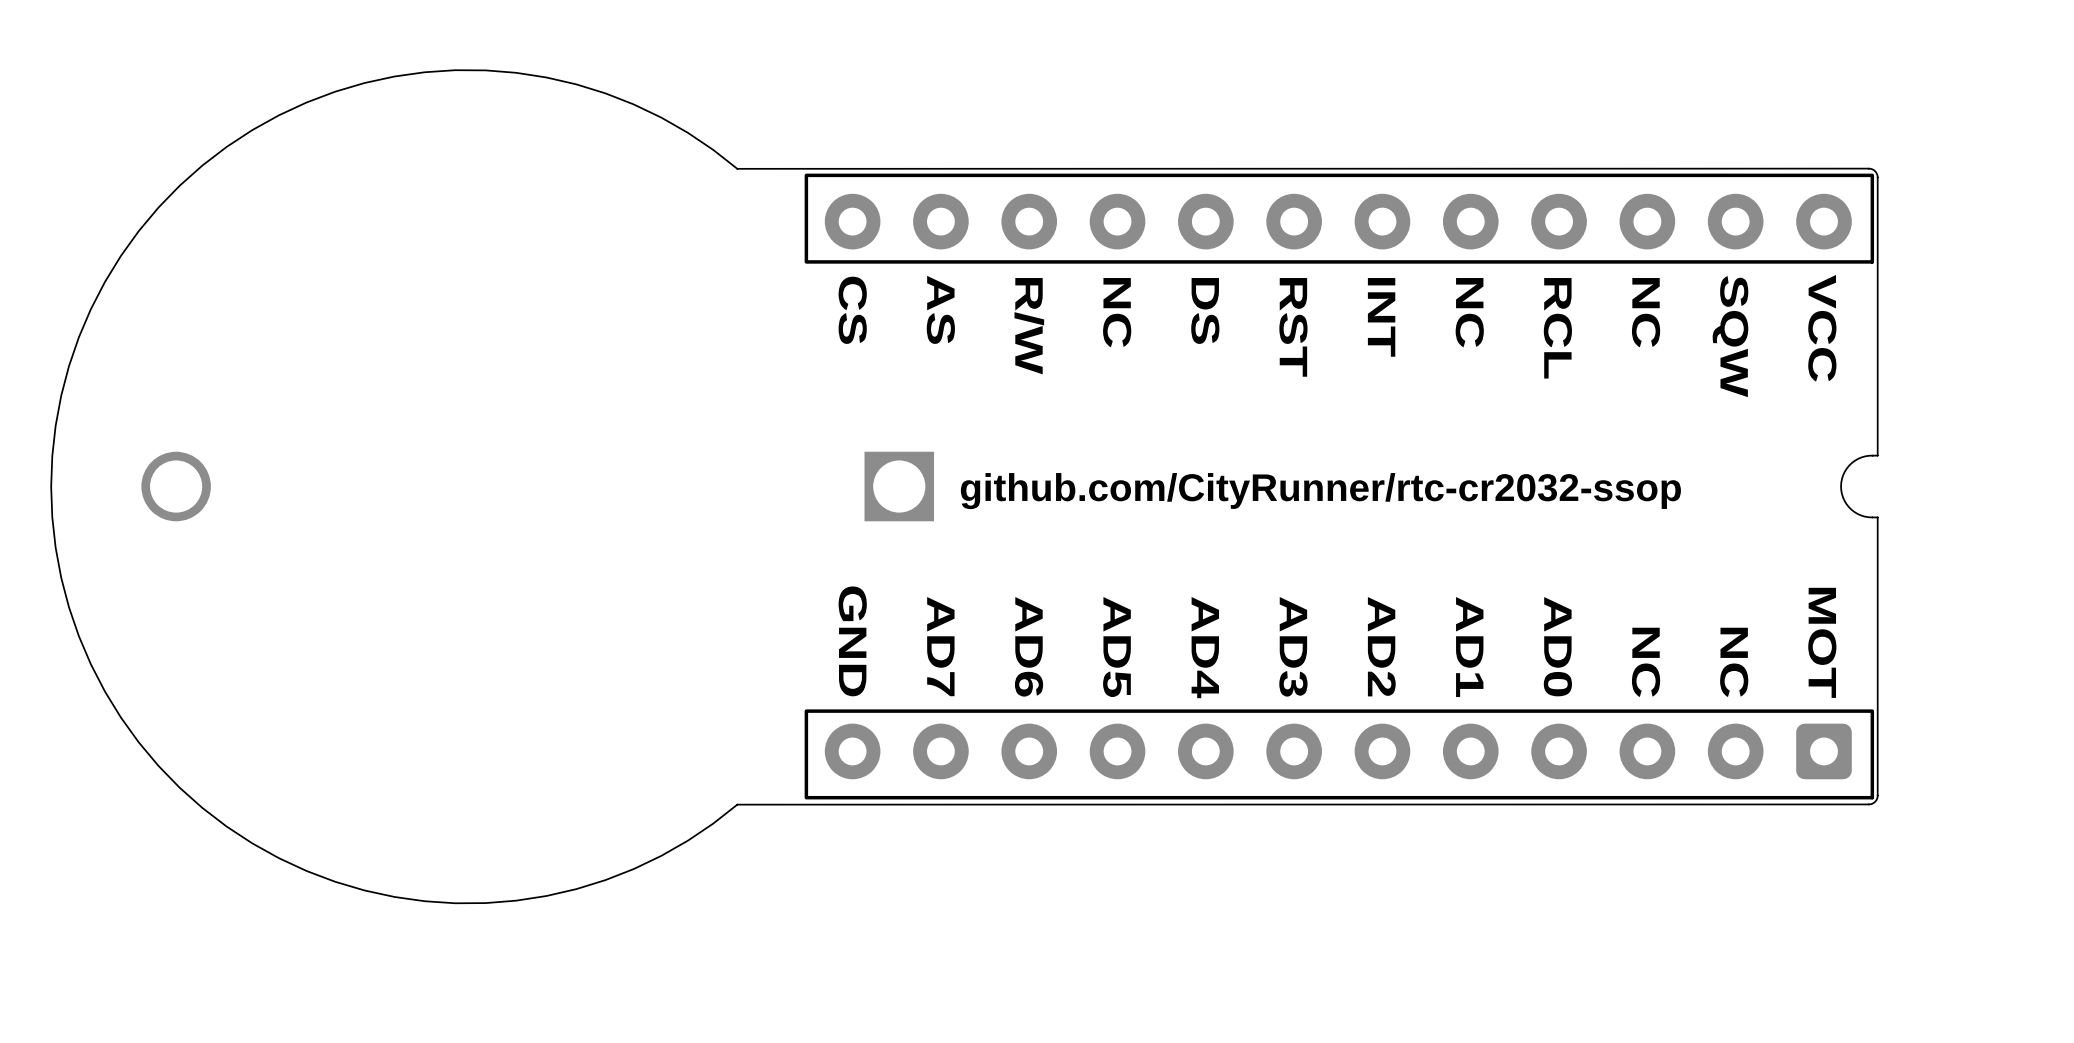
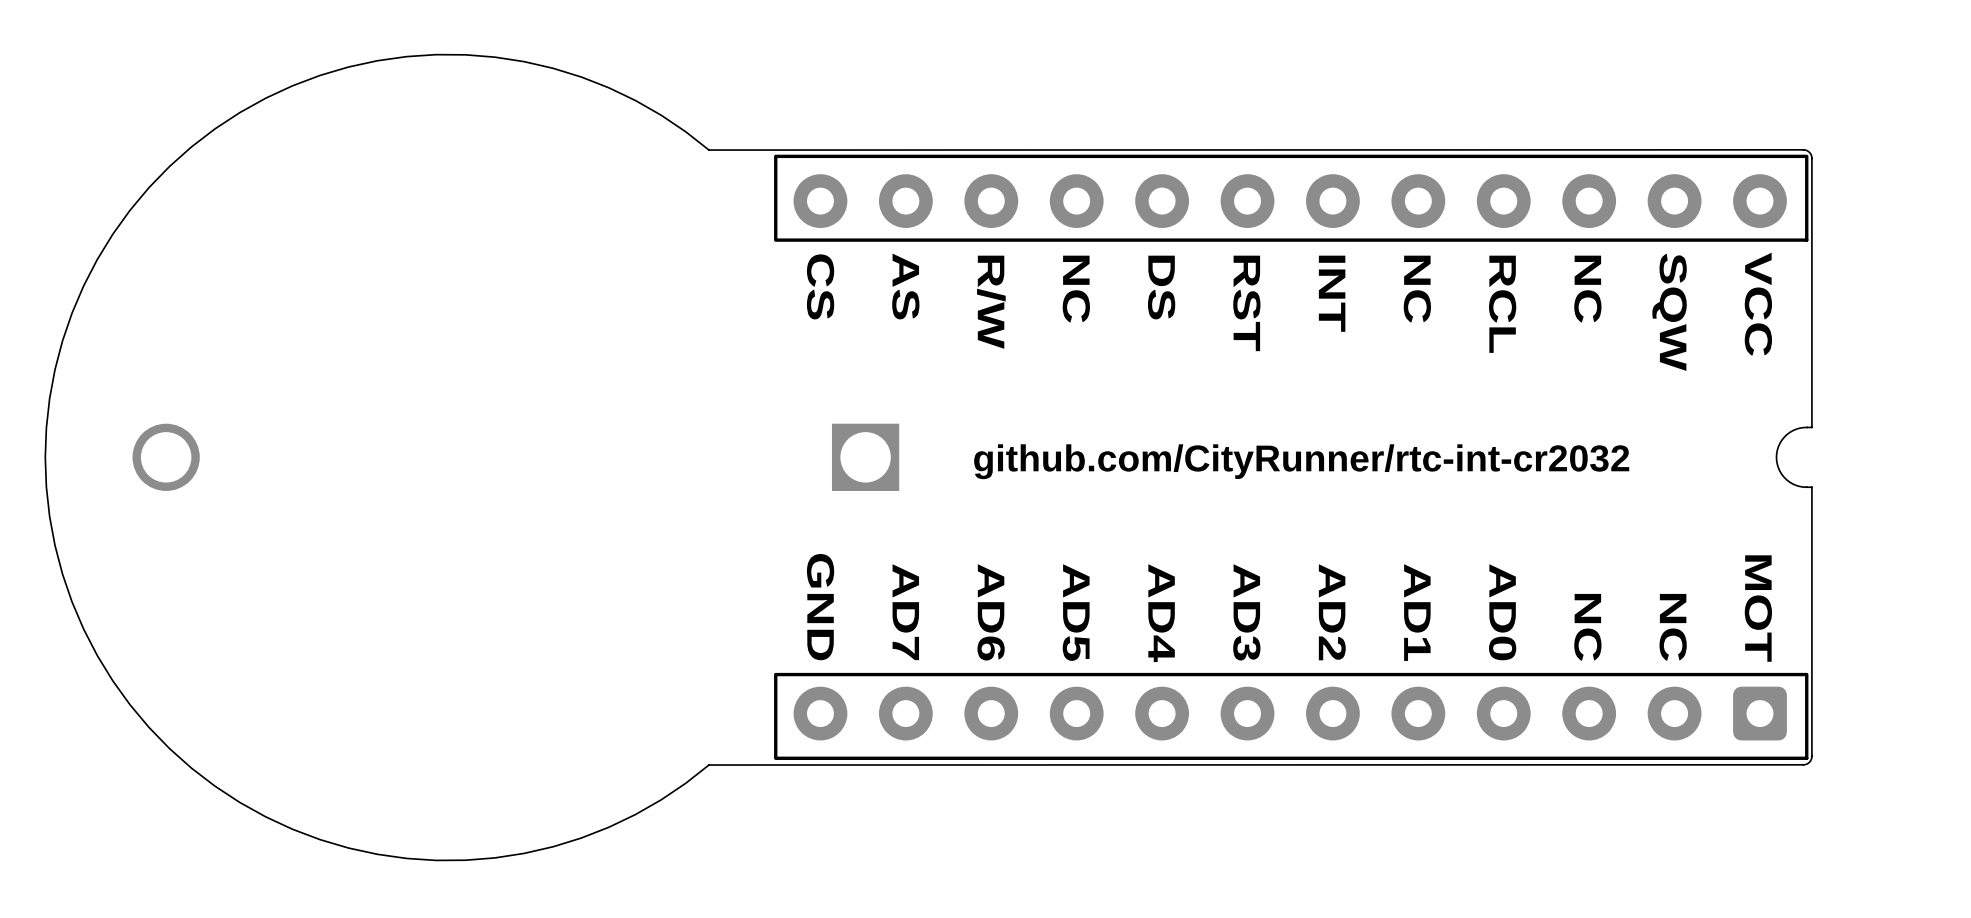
text: github.com/CityRunner/rtc-cr2032-ssop (1320, 491) -> github.com/CityRunner/rtc-int-cr2032 (1301, 461)

